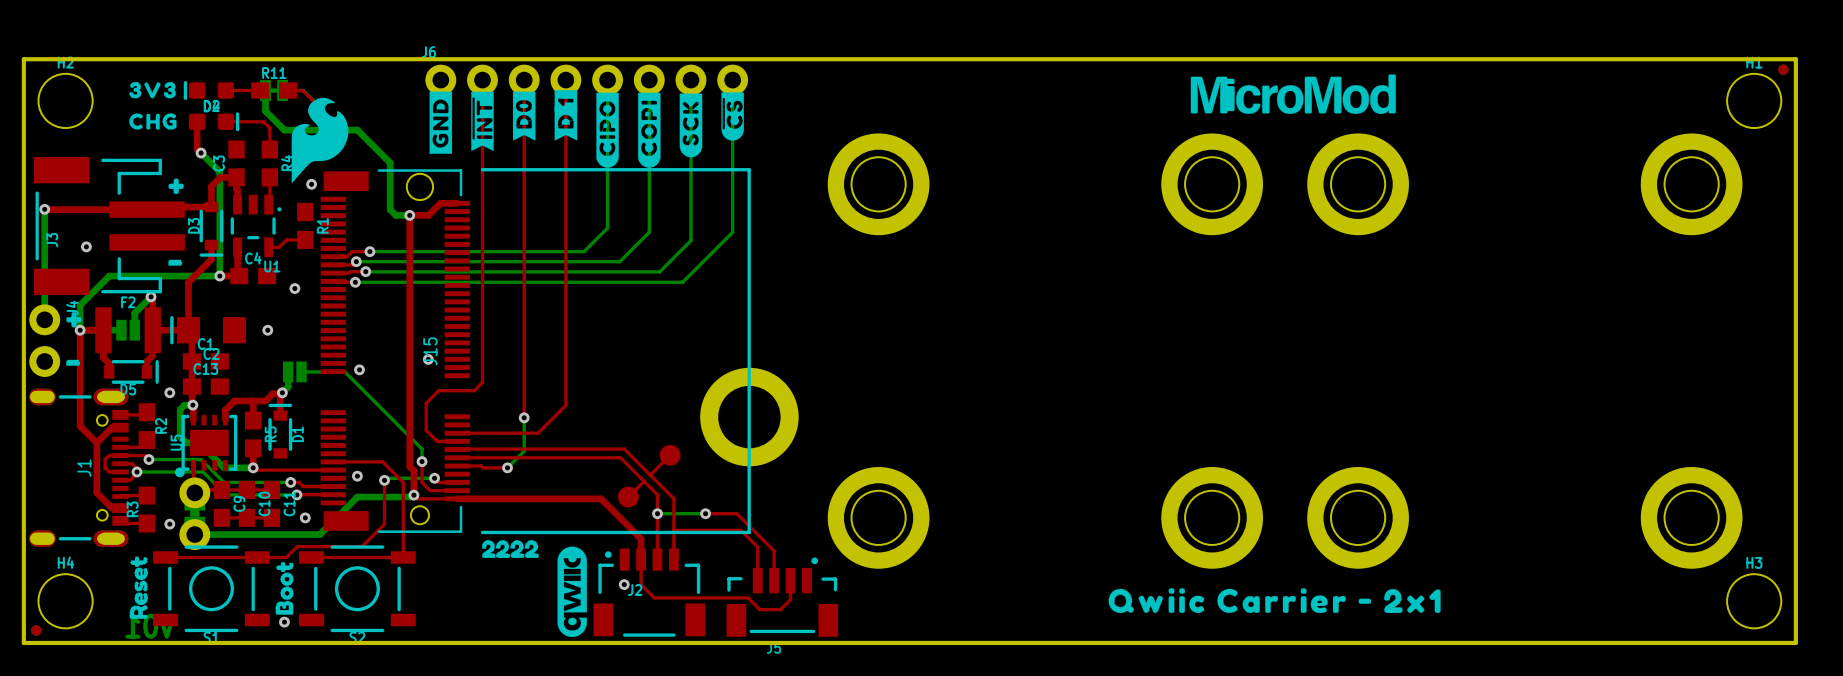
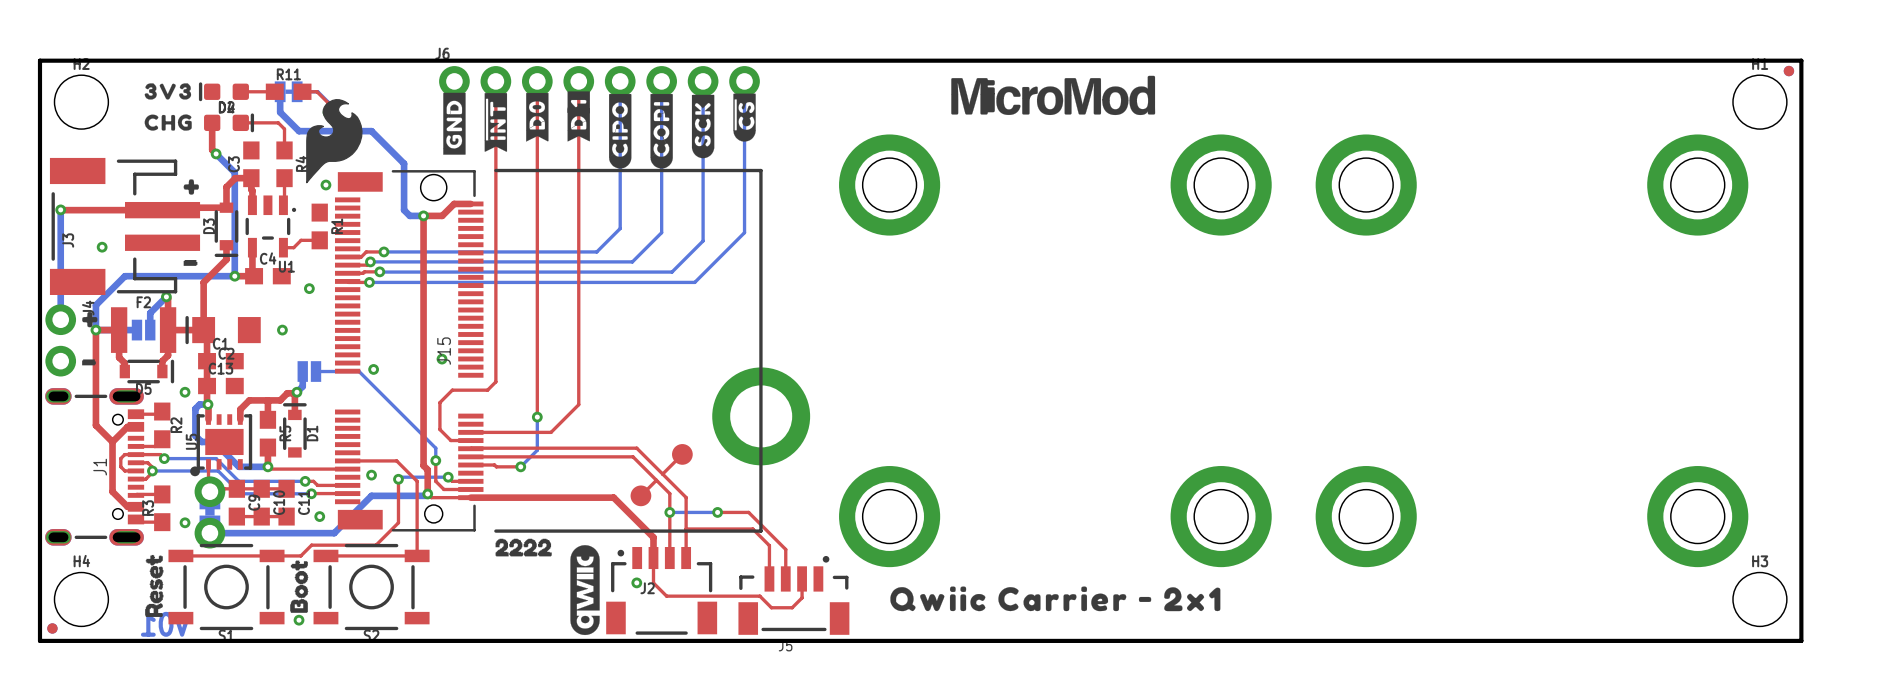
drawing position: (1293, 94) -> (1053, 95)
drawing position: (1274, 600) -> (1055, 598)

